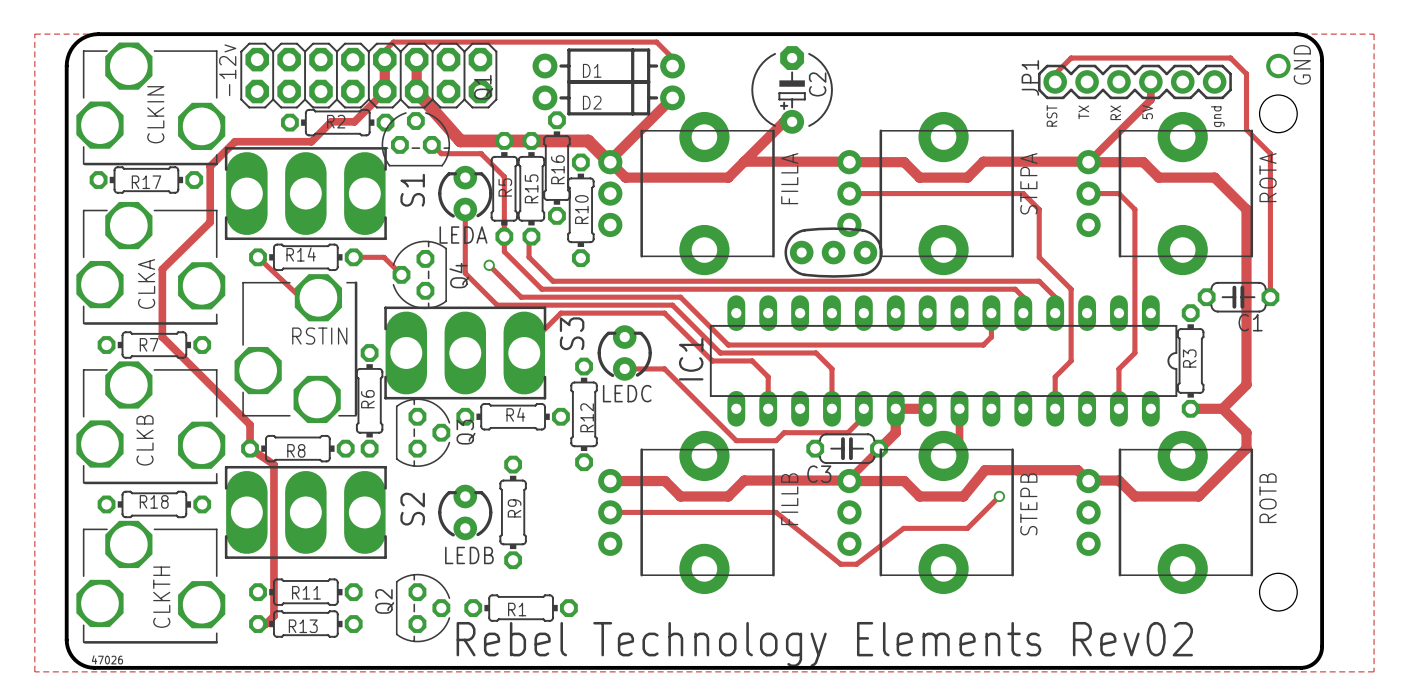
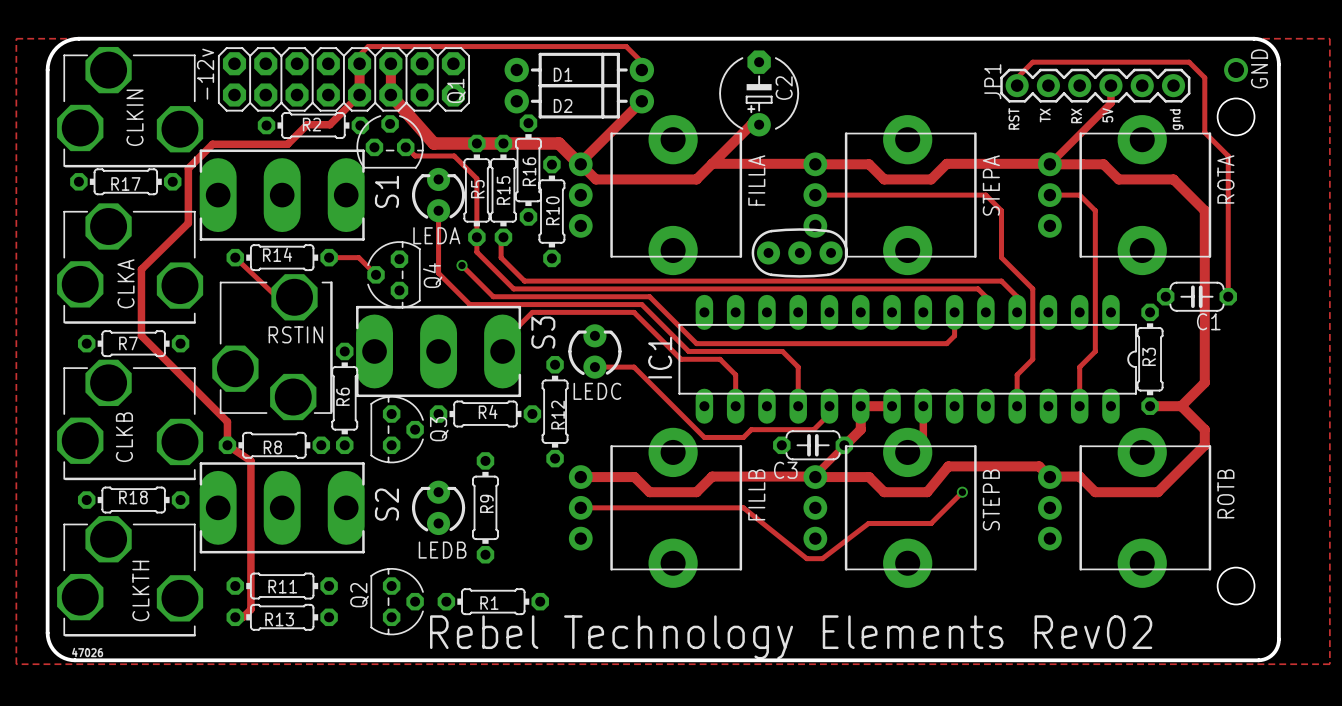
S1 footprint: [224, 147, 387, 241] -> [199, 149, 365, 241]
S3 footprint: [384, 306, 547, 400] -> [356, 305, 522, 398]
S2 footprint: [224, 465, 387, 559] -> [199, 462, 365, 554]

